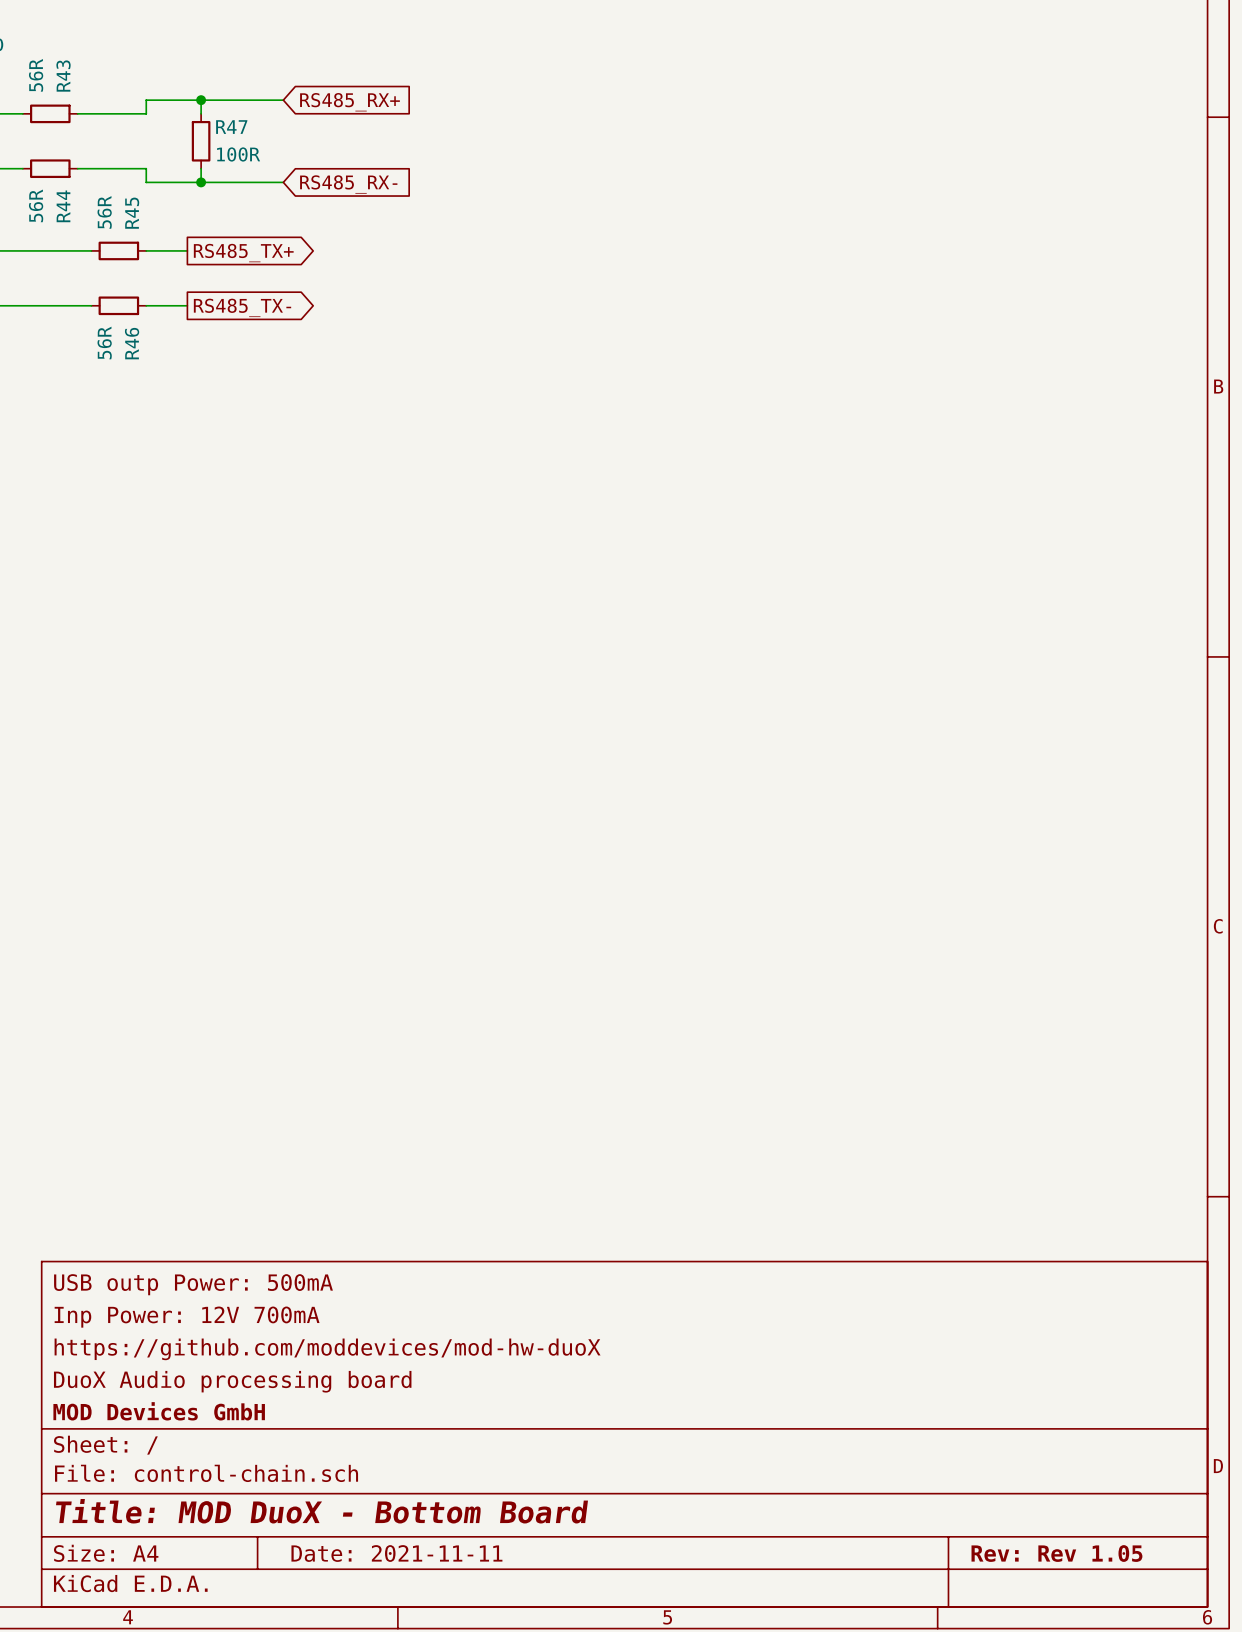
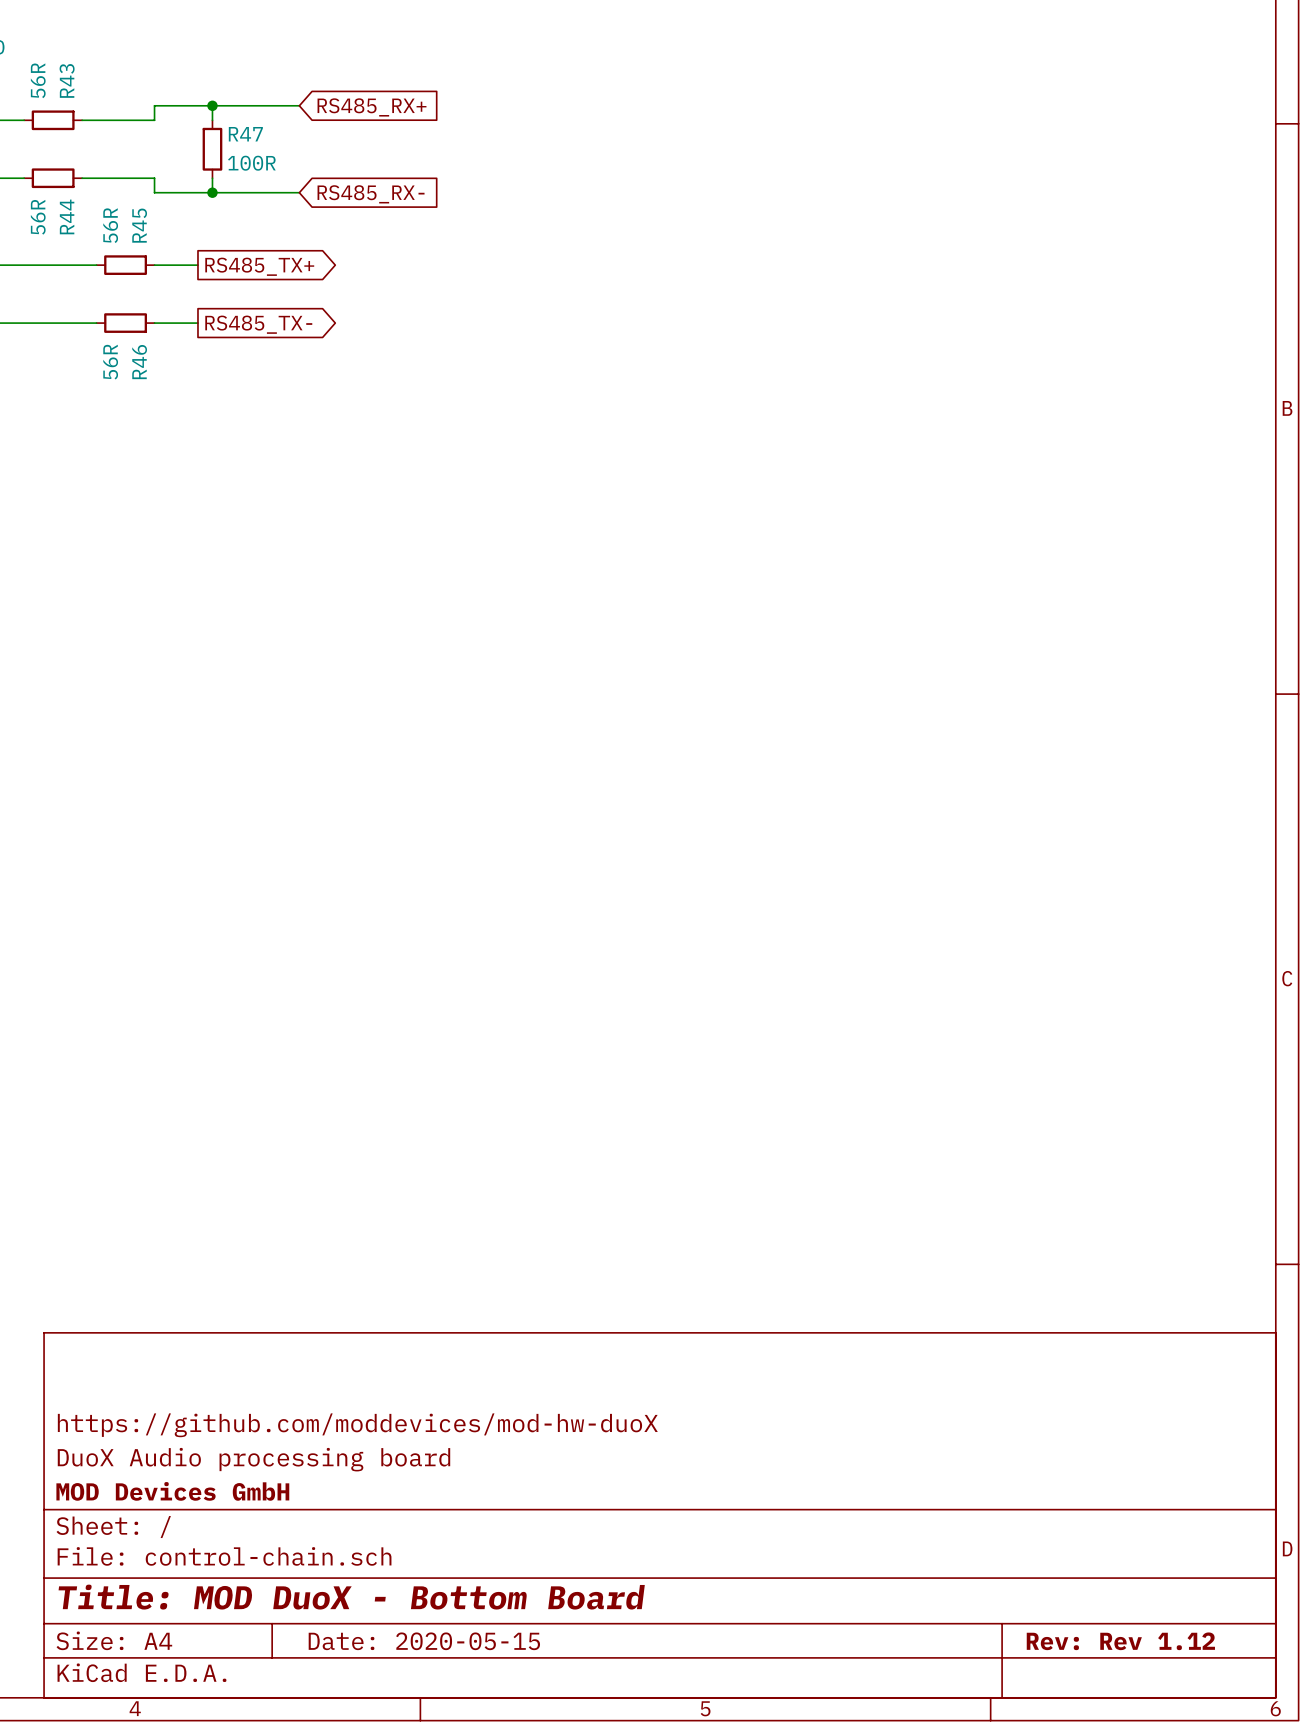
title block: USB outp Power: 500mA (193, 1284) -> none
title block: Inp Power: 12V 700mA (187, 1317) -> none
title block: Date: 2021-11-11 (396, 1553) -> Date: 2020-05-15 (424, 1641)
title block: Rev: Rev 1.05 (1056, 1553) -> Rev: Rev 1.12 (1120, 1641)

